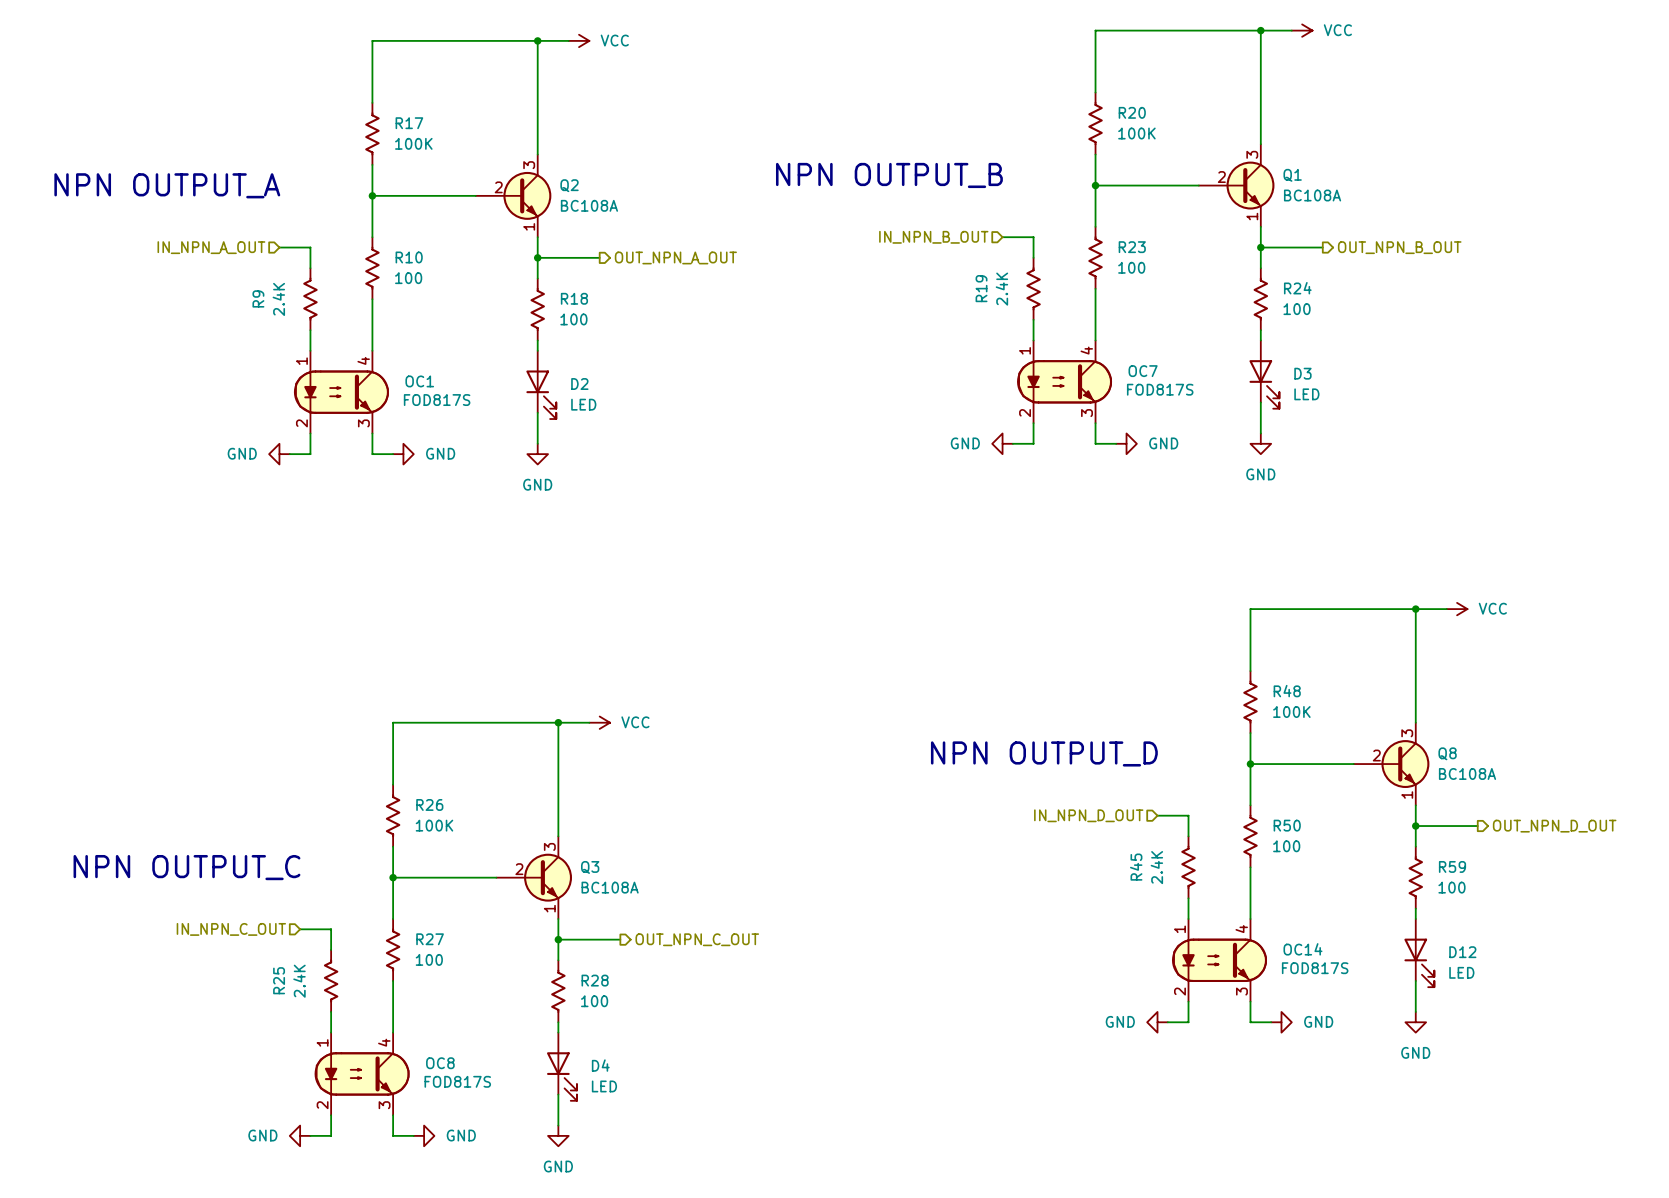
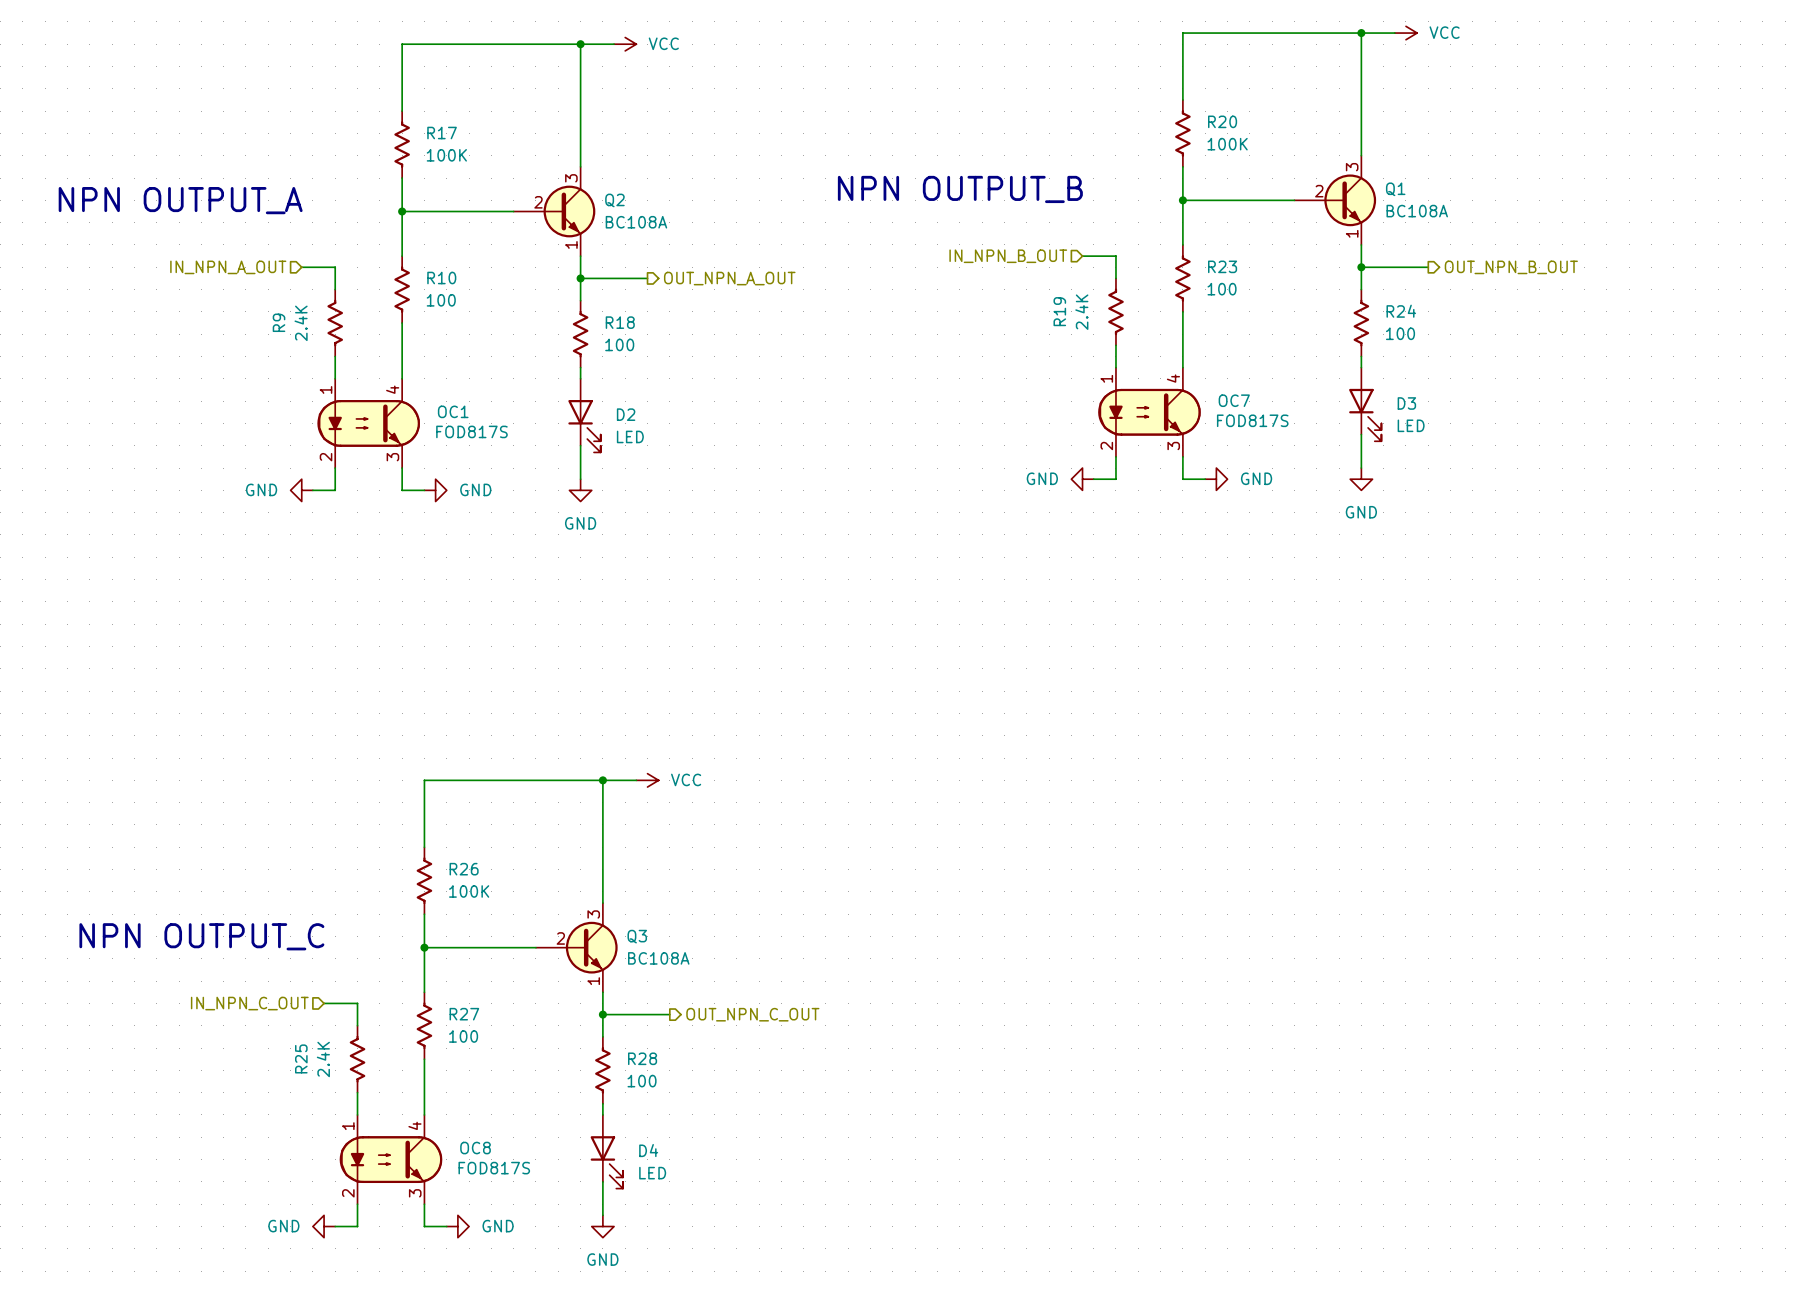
wire: (1415, 609) (1415, 722) -> none
junction: (1415, 609) -> none
wire: (1446, 609) (1250, 609) (1250, 671) -> none
power symbol: VCC (1457, 609) -> none
R48: 100K (1250, 702) -> none
wire: (1250, 733) (1250, 805) -> none
text: NPN OUTPUT_D (1044, 753) -> none
wire: (1250, 764) (1353, 764) -> none
junction: (1250, 764) -> none
Q8: BC108A (1391, 764) -> none
wire: (1415, 805) (1415, 846) -> none
hierarchical label: IN_NPN_D_OUT (1088, 815) -> none
wire: (1157, 815) (1188, 815) (1188, 836) -> none
wire: (1415, 826) (1477, 826) -> none
junction: (1415, 826) -> none
hierarchical label: OUT_NPN_D_OUT (1554, 826) -> none
R50: 100 (1250, 836) -> none
R45: 2.4K (1188, 867) -> none
wire: (1250, 867) (1250, 918) -> none
R59: 100 (1415, 877) -> none
wire: (1188, 898) (1188, 918) -> none
wire: (1415, 908) (1415, 918) -> none
D12: LED (1419, 953) -> none
OC14: FOD817S (1219, 960) -> none
wire: (1415, 980) (1415, 1011) -> none
wire: (1188, 1001) (1188, 1022) (1167, 1022) -> none
wire: (1250, 1001) (1250, 1022) (1271, 1022) -> none
power symbol: GND (1157, 1022) -> none
power symbol: GND (1281, 1022) -> none
power symbol: GND (1415, 1022) -> none

